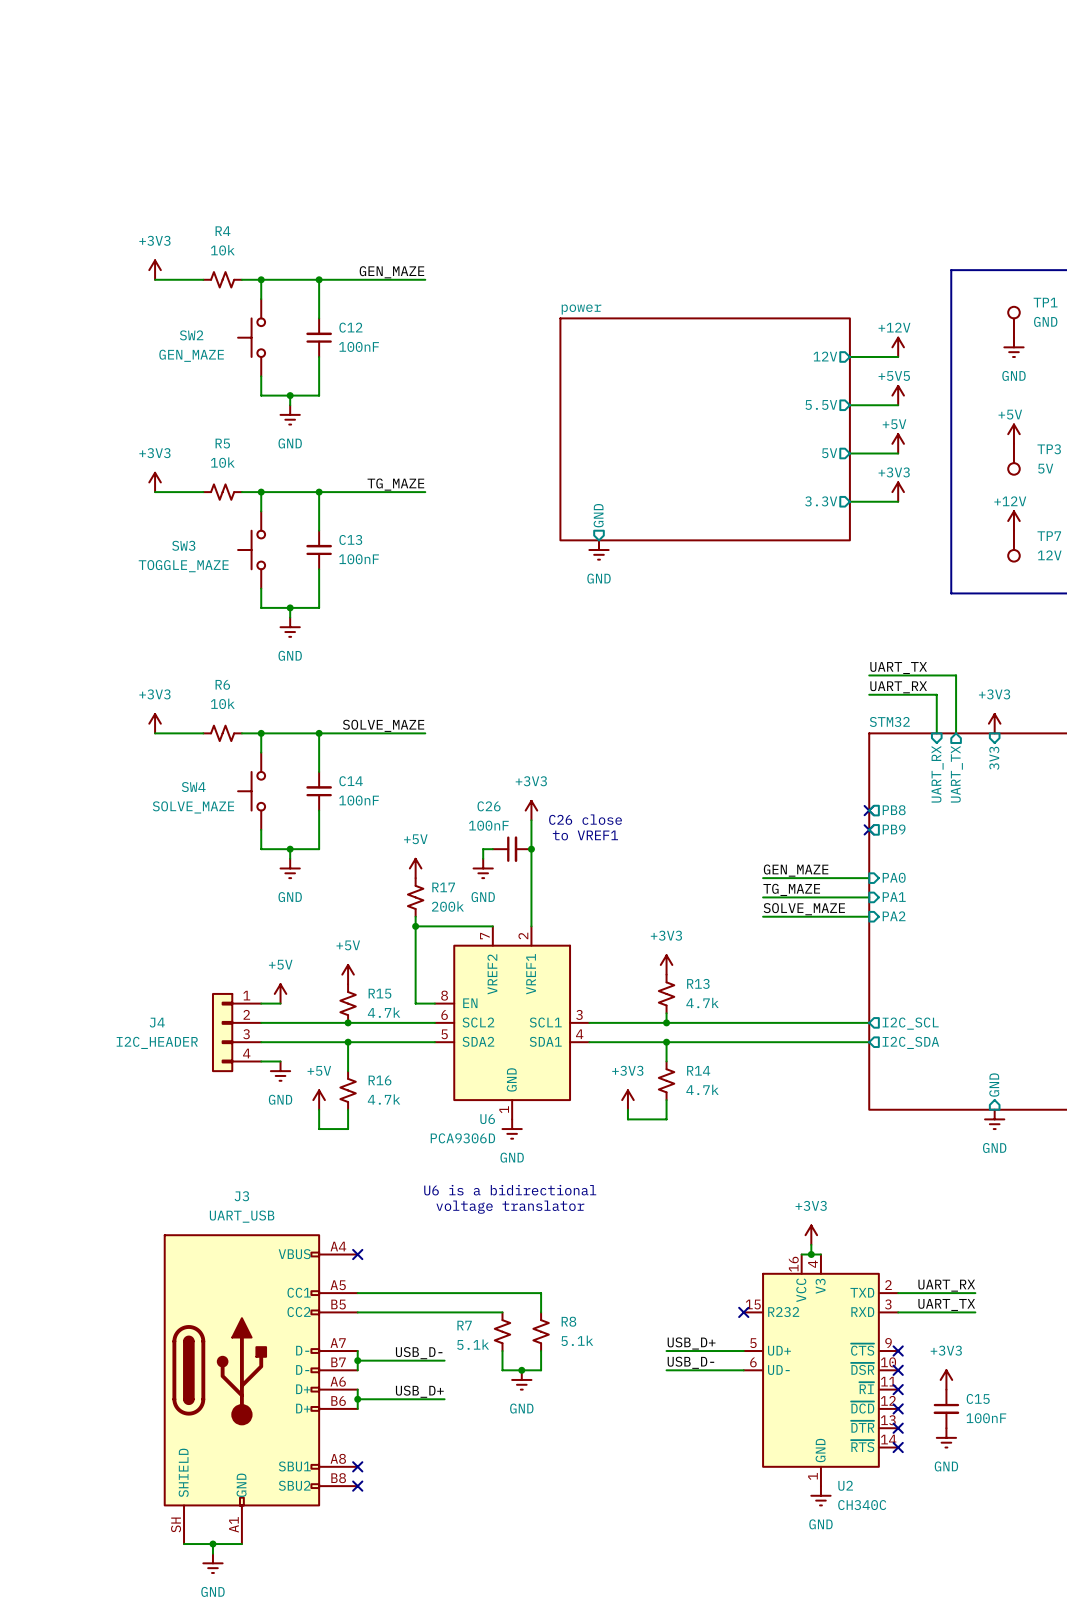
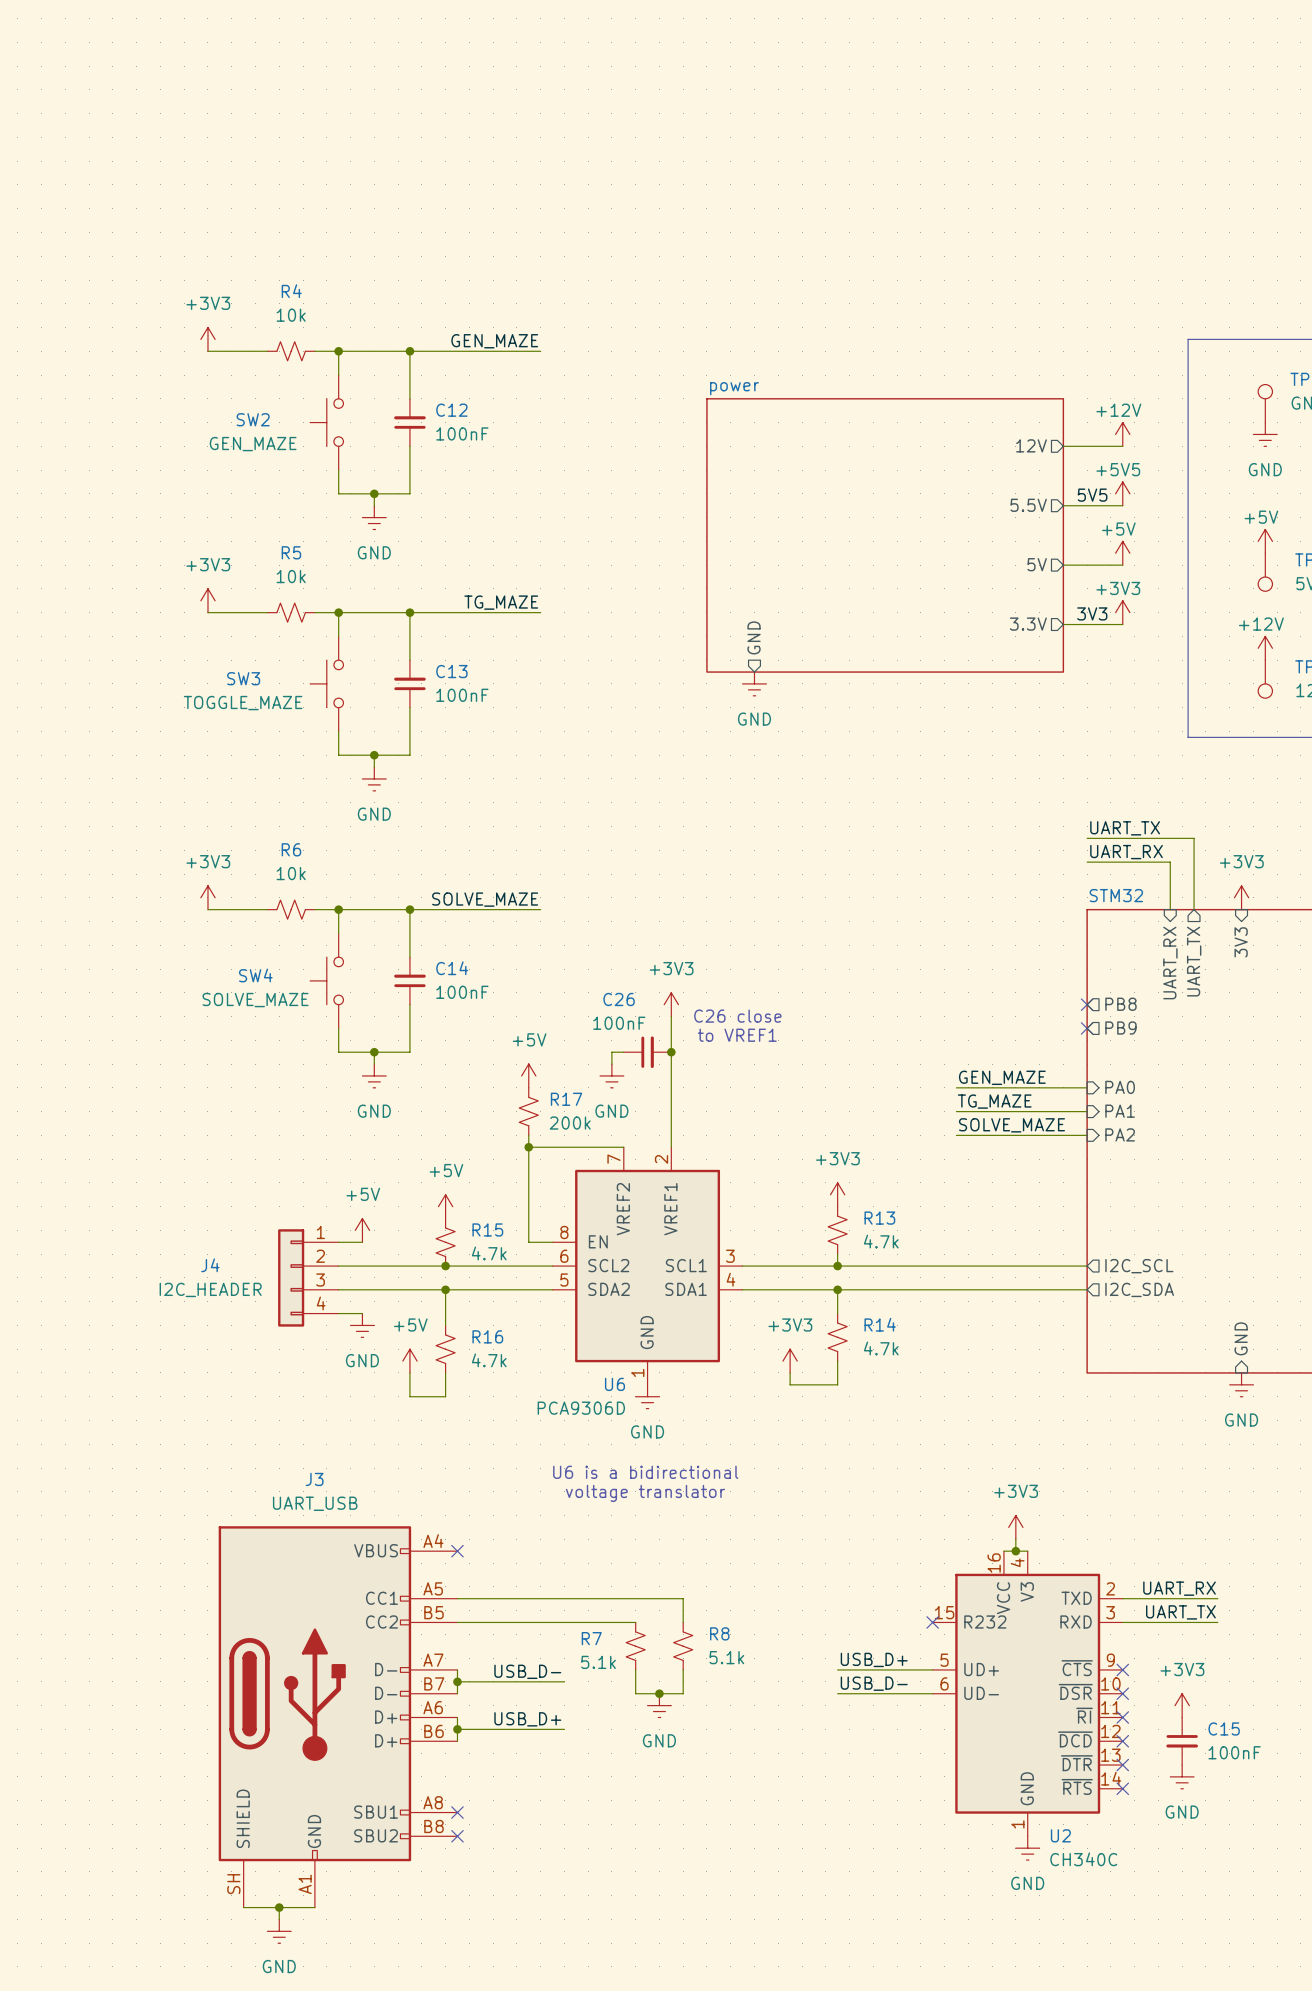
label: none -> 5V5 (1092, 495)
label: none -> 3V3 (1092, 613)

